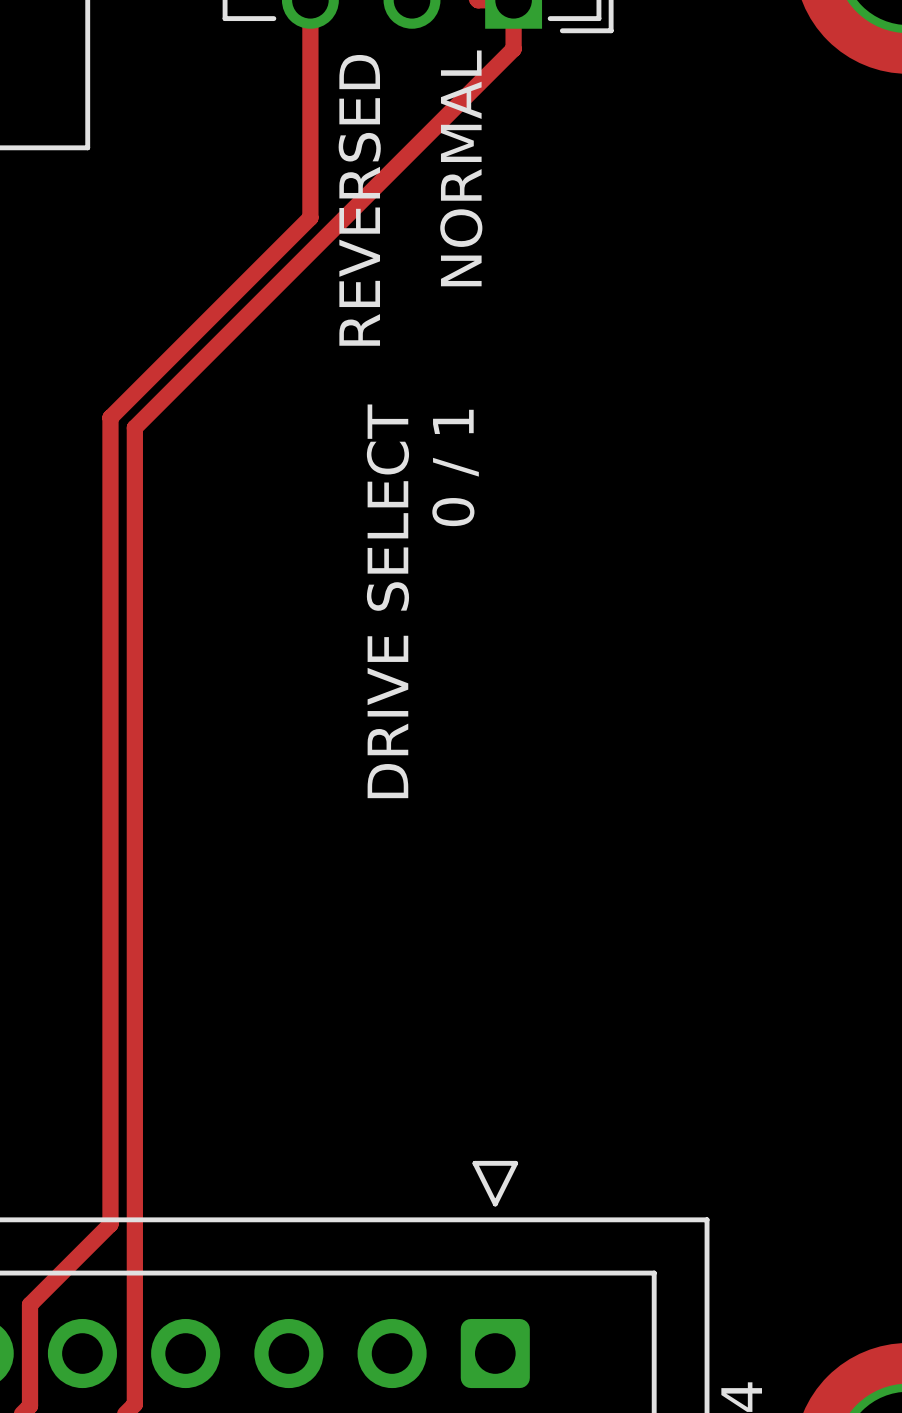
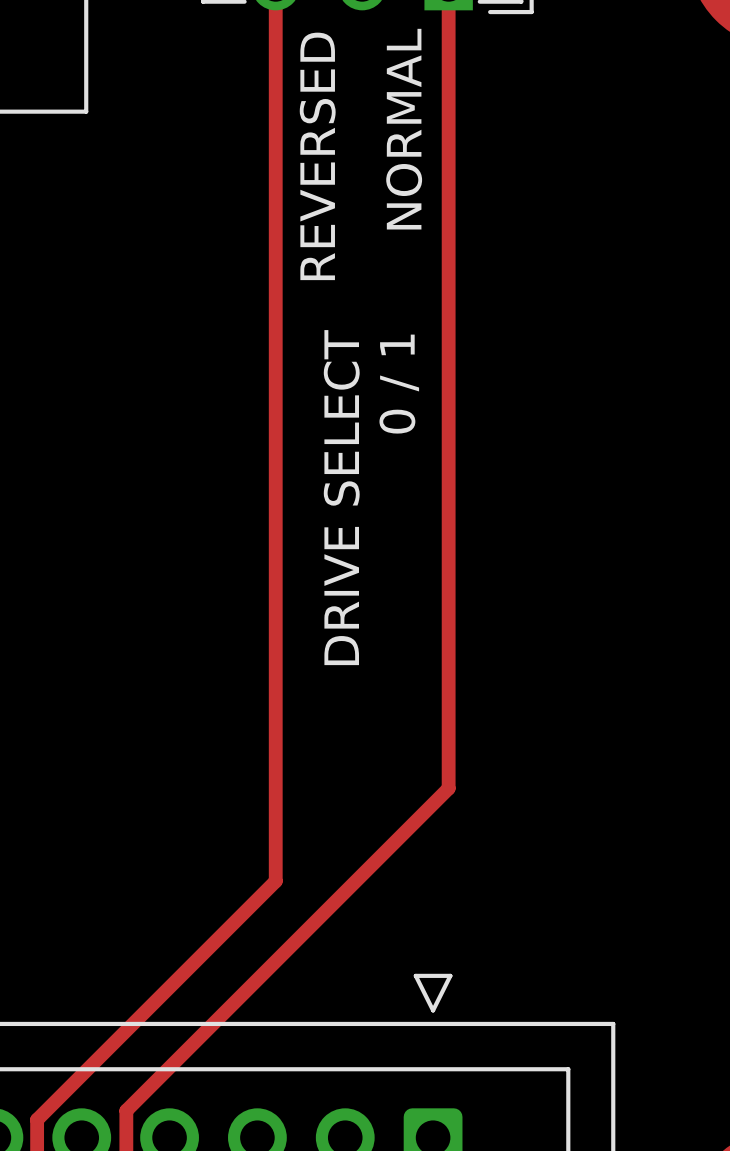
track: (513, 49) (134, 427) (134, 1321) -> (448, 27) (448, 788) (126, 1110)
track: (310, 217) (110, 417) (110, 1224) (30, 1304) (30, 1332) -> (275, 171) (275, 881) (37, 1119)

